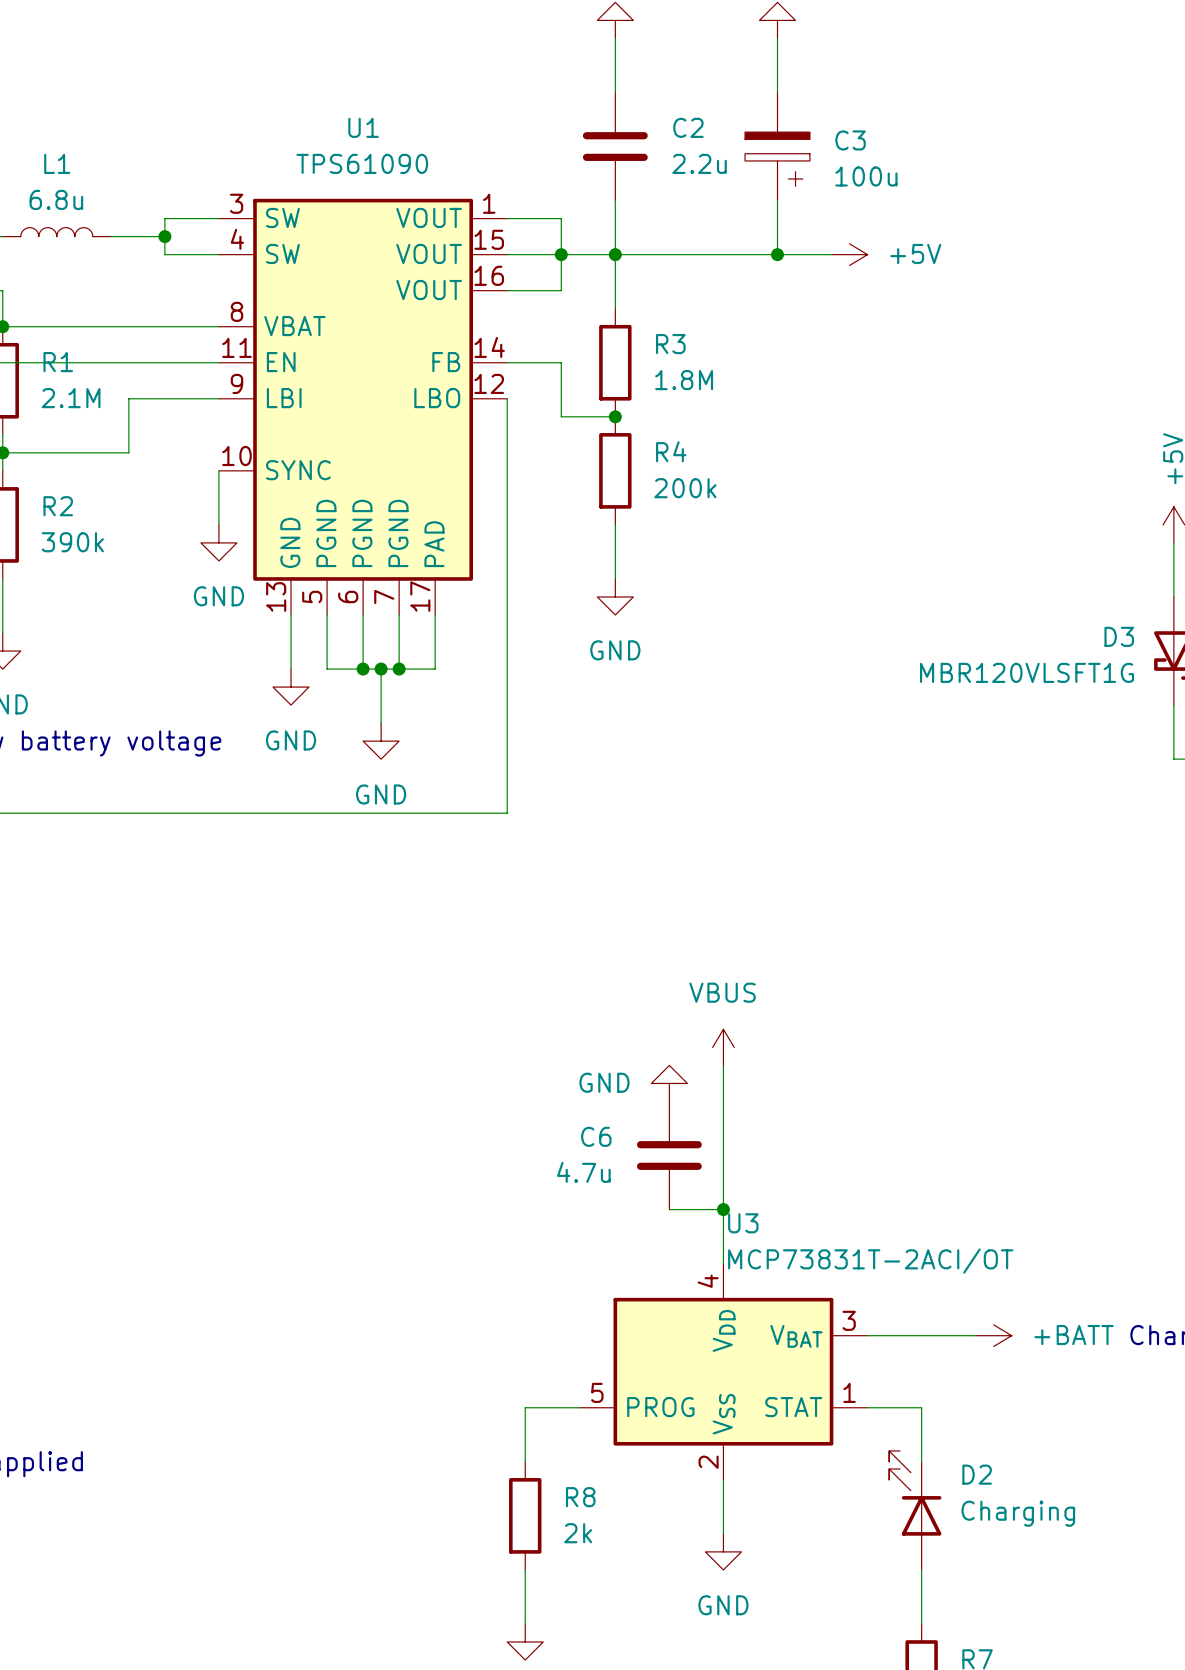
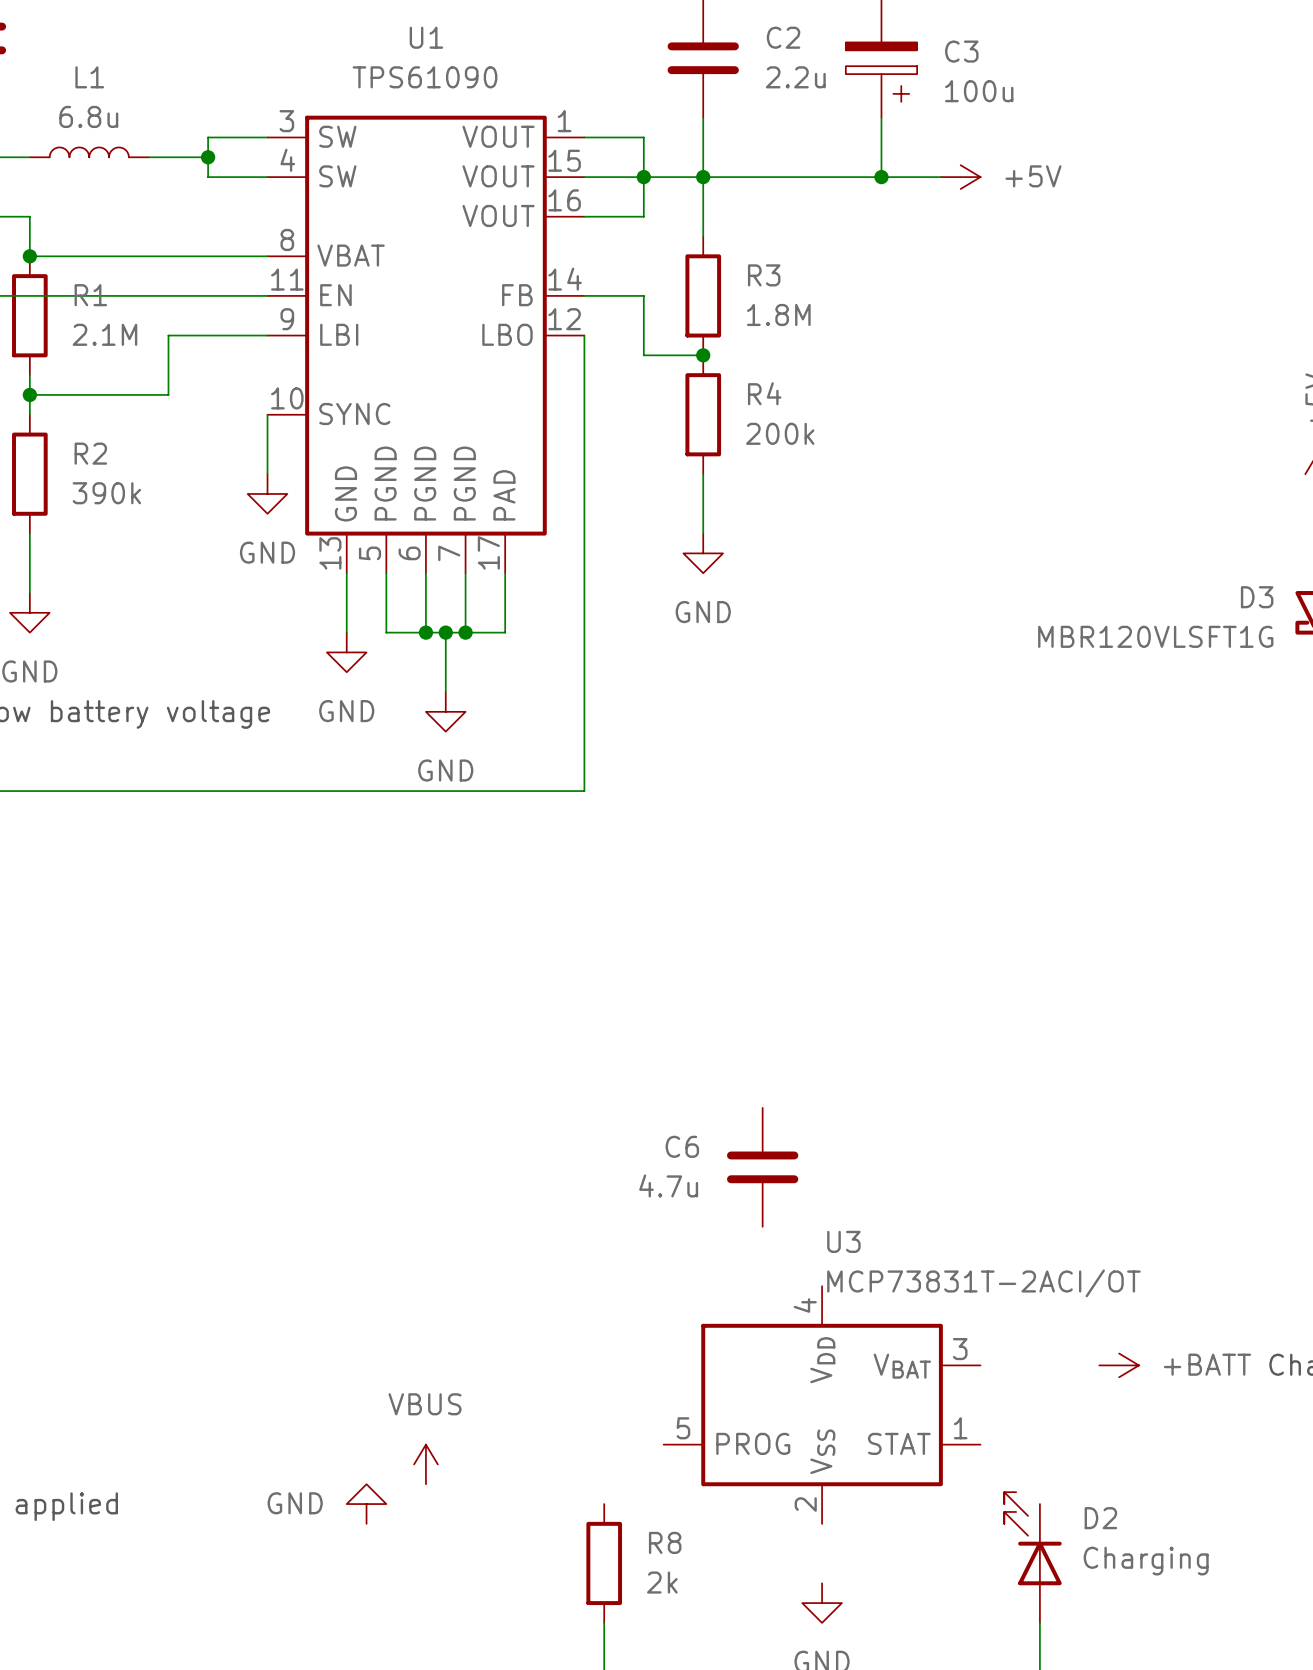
power symbol: VBUS (723, 1047) -> none
wire: (723, 1065) (723, 1263) -> none
power symbol: GND (669, 1083) -> none
wire: (669, 1209) (723, 1209) -> none
junction: (723, 1209) -> none
wire: (867, 1335) (975, 1335) -> none
wire: (579, 1407) (525, 1407) (525, 1461) -> none
wire: (867, 1407) (921, 1407) (921, 1461) -> none
power symbol: none -> VBUS (425, 1464)
power symbol: none -> GND (366, 1504)
wire: (723, 1479) (723, 1533) -> none

